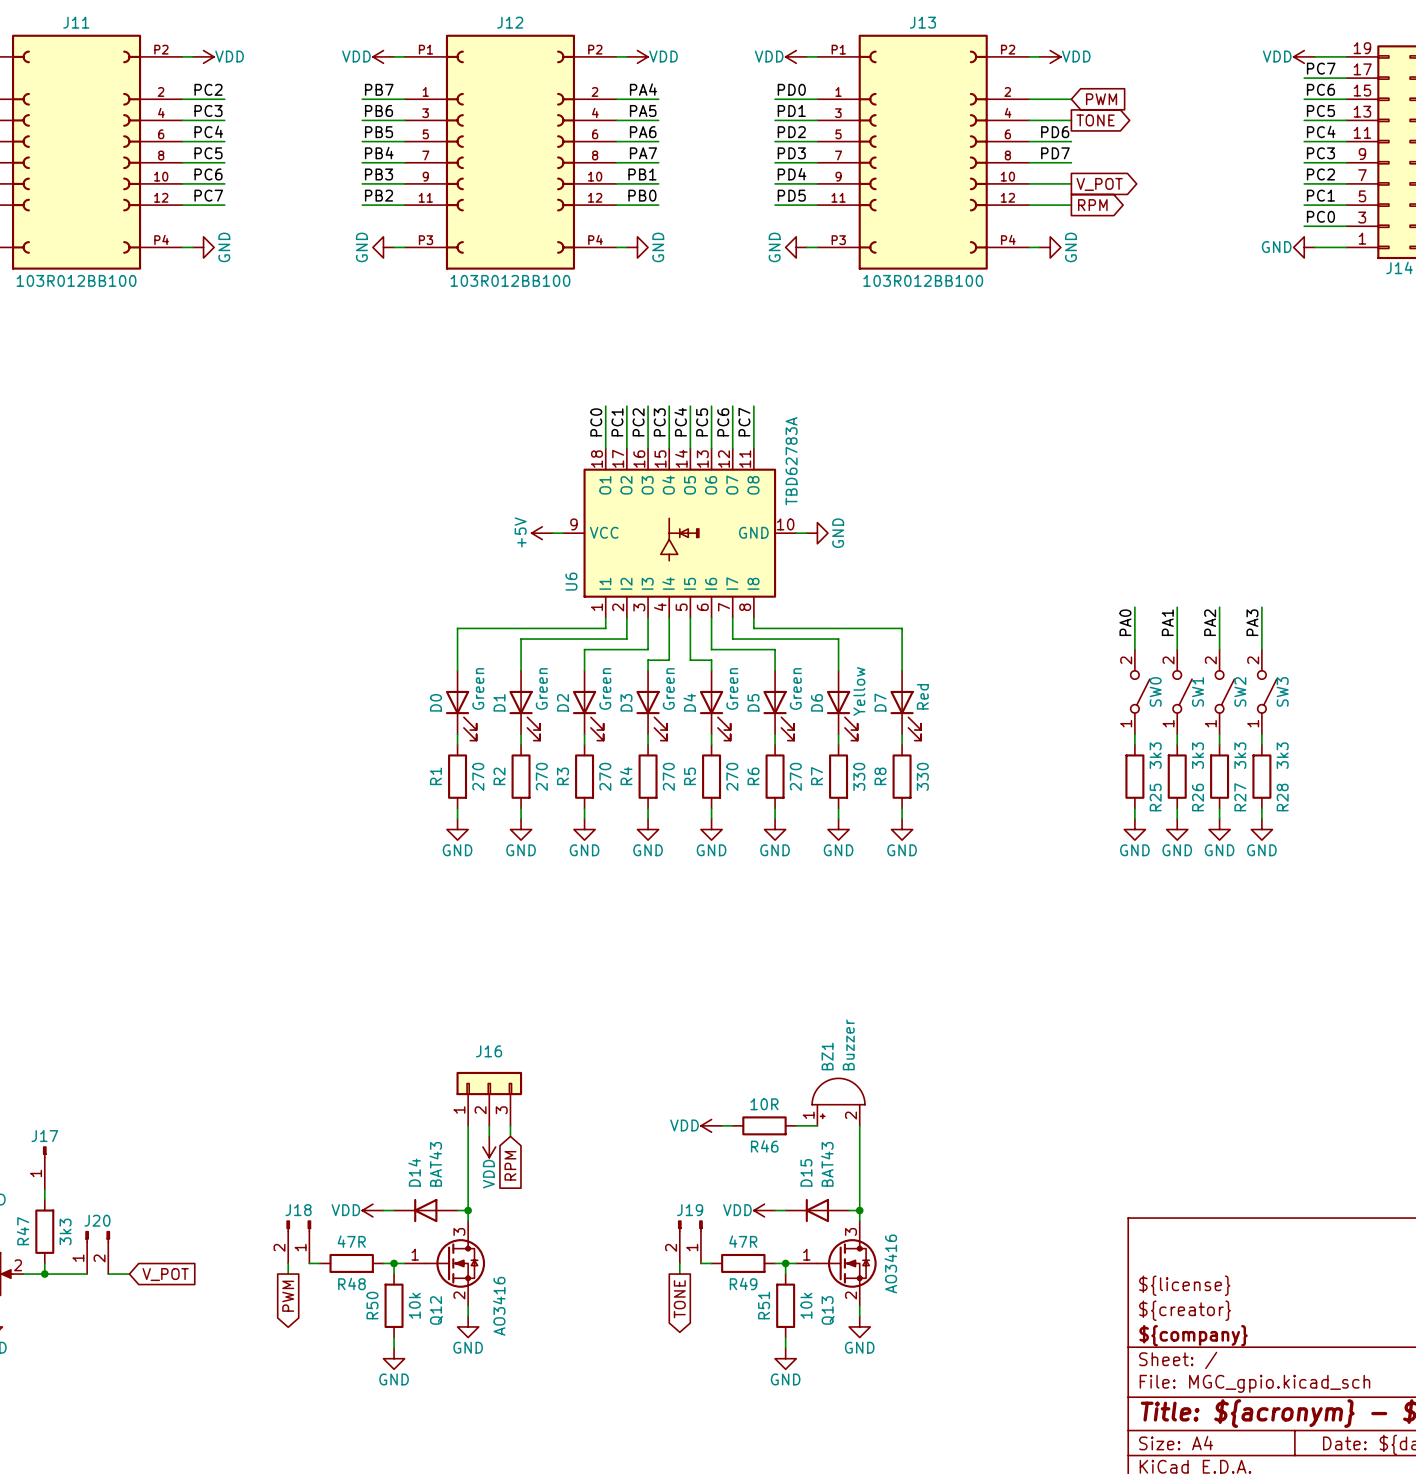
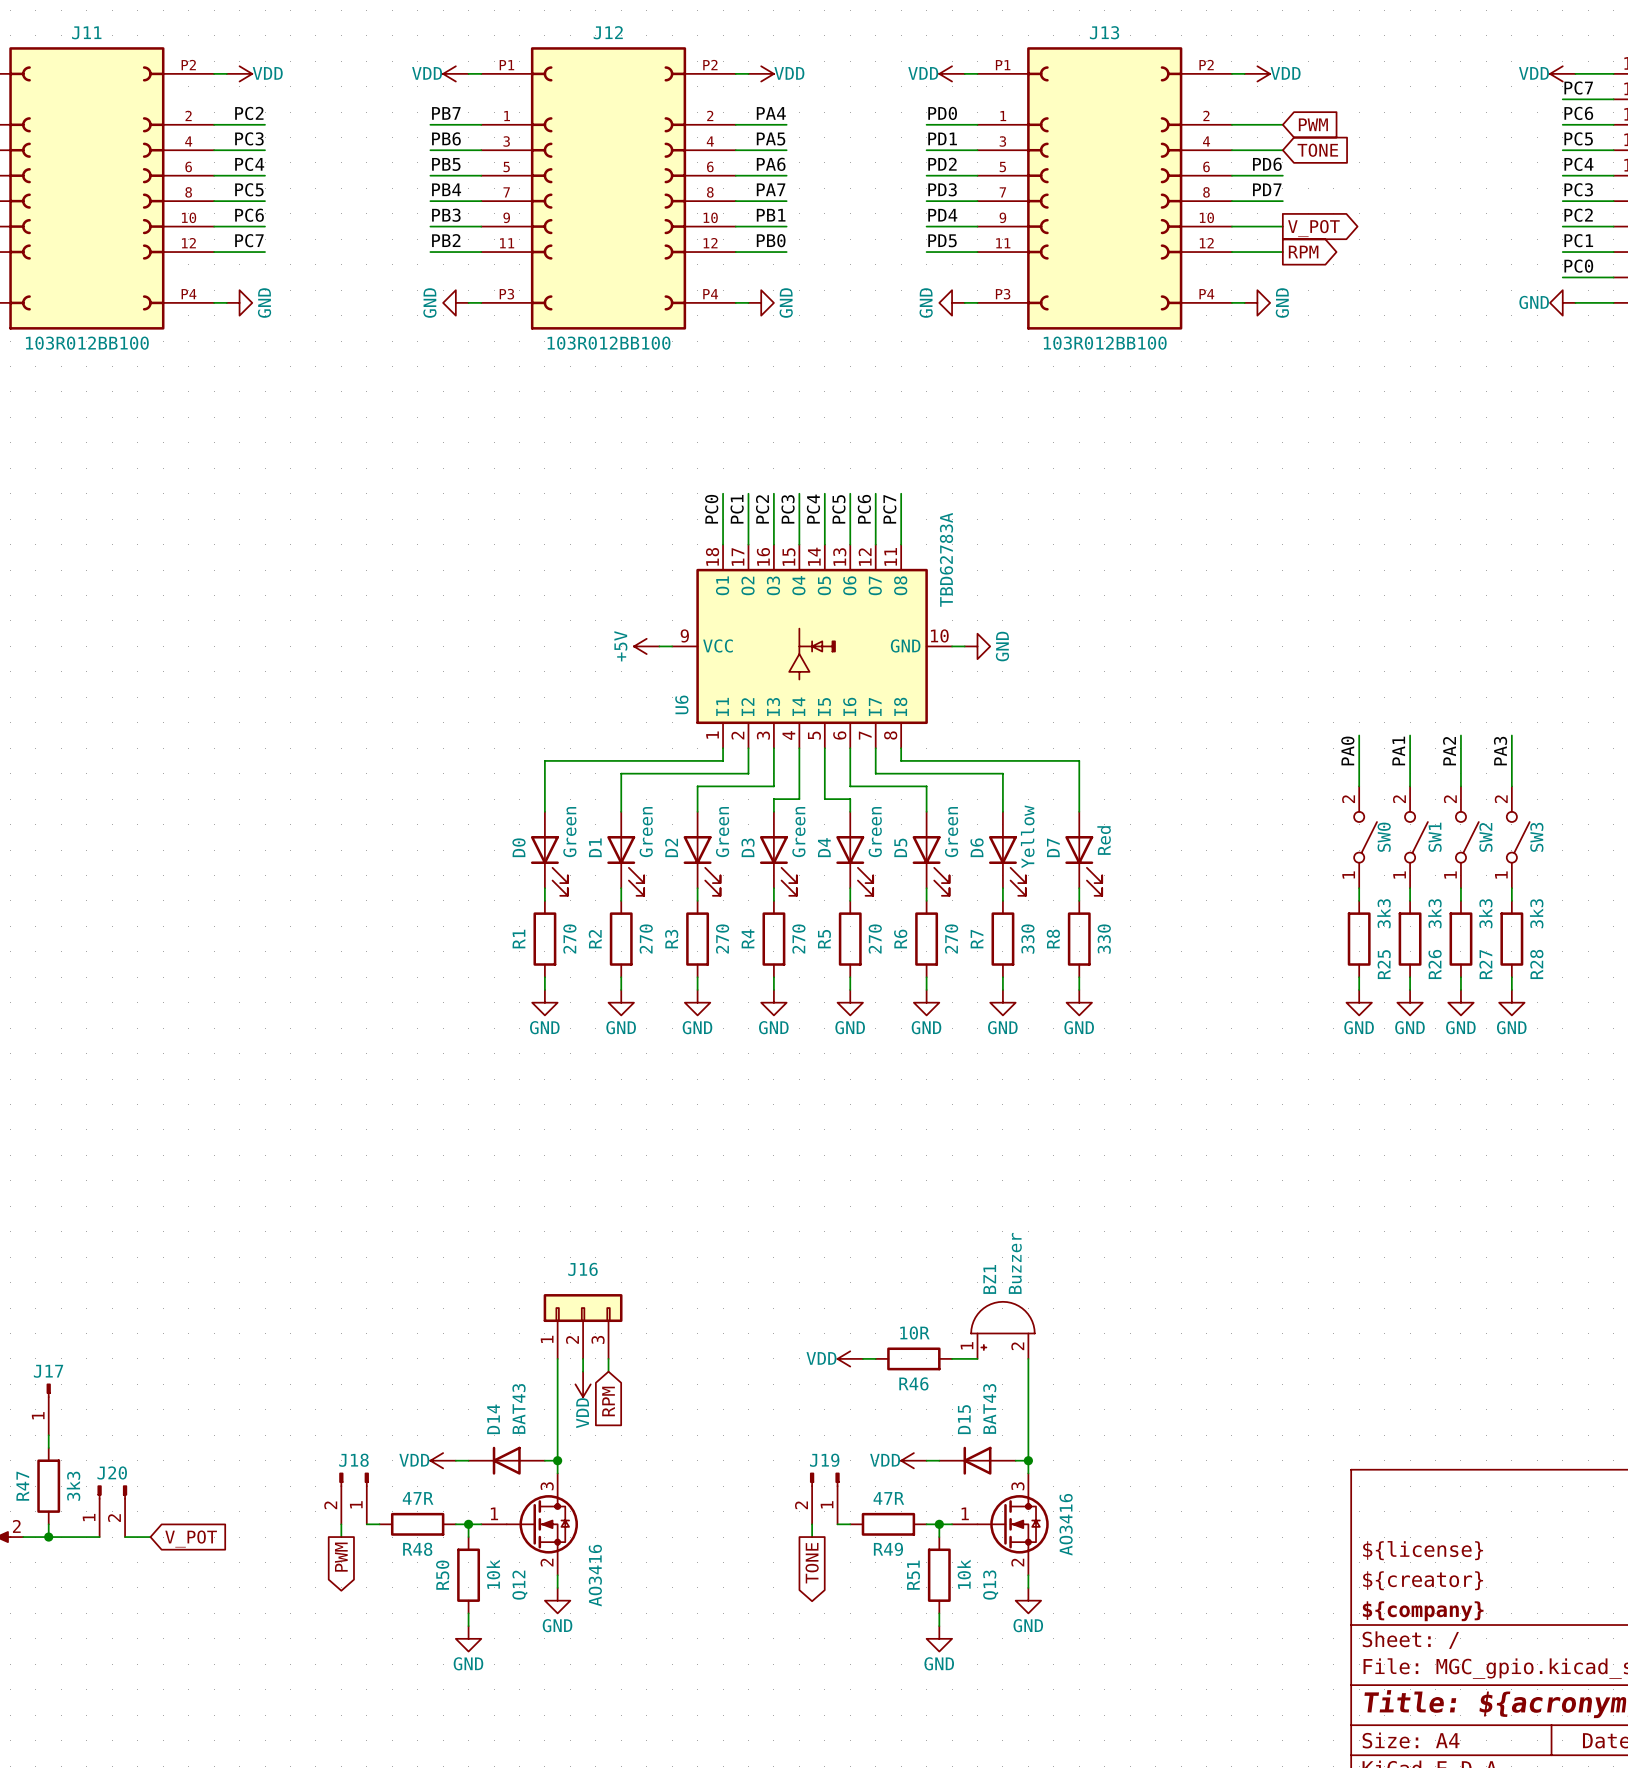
global label shape: output (1095, 120) -> input (1317, 150)

